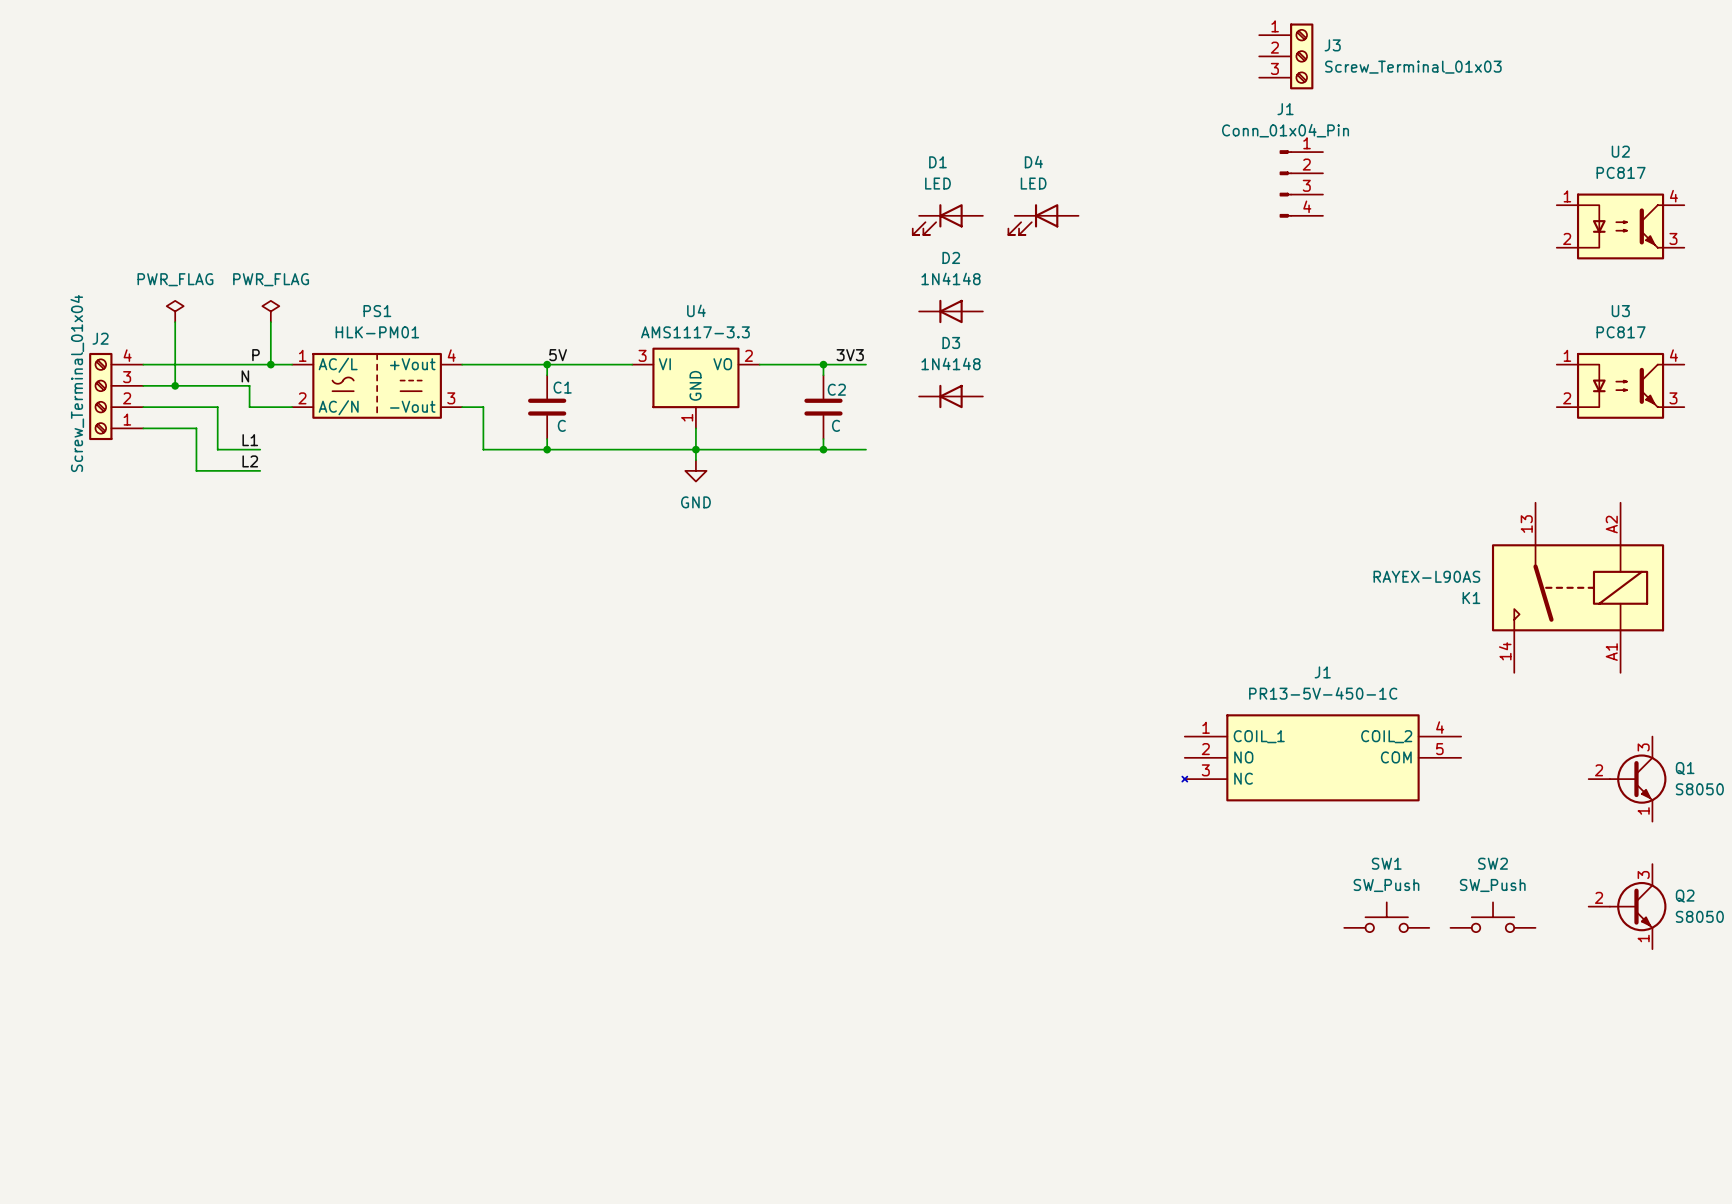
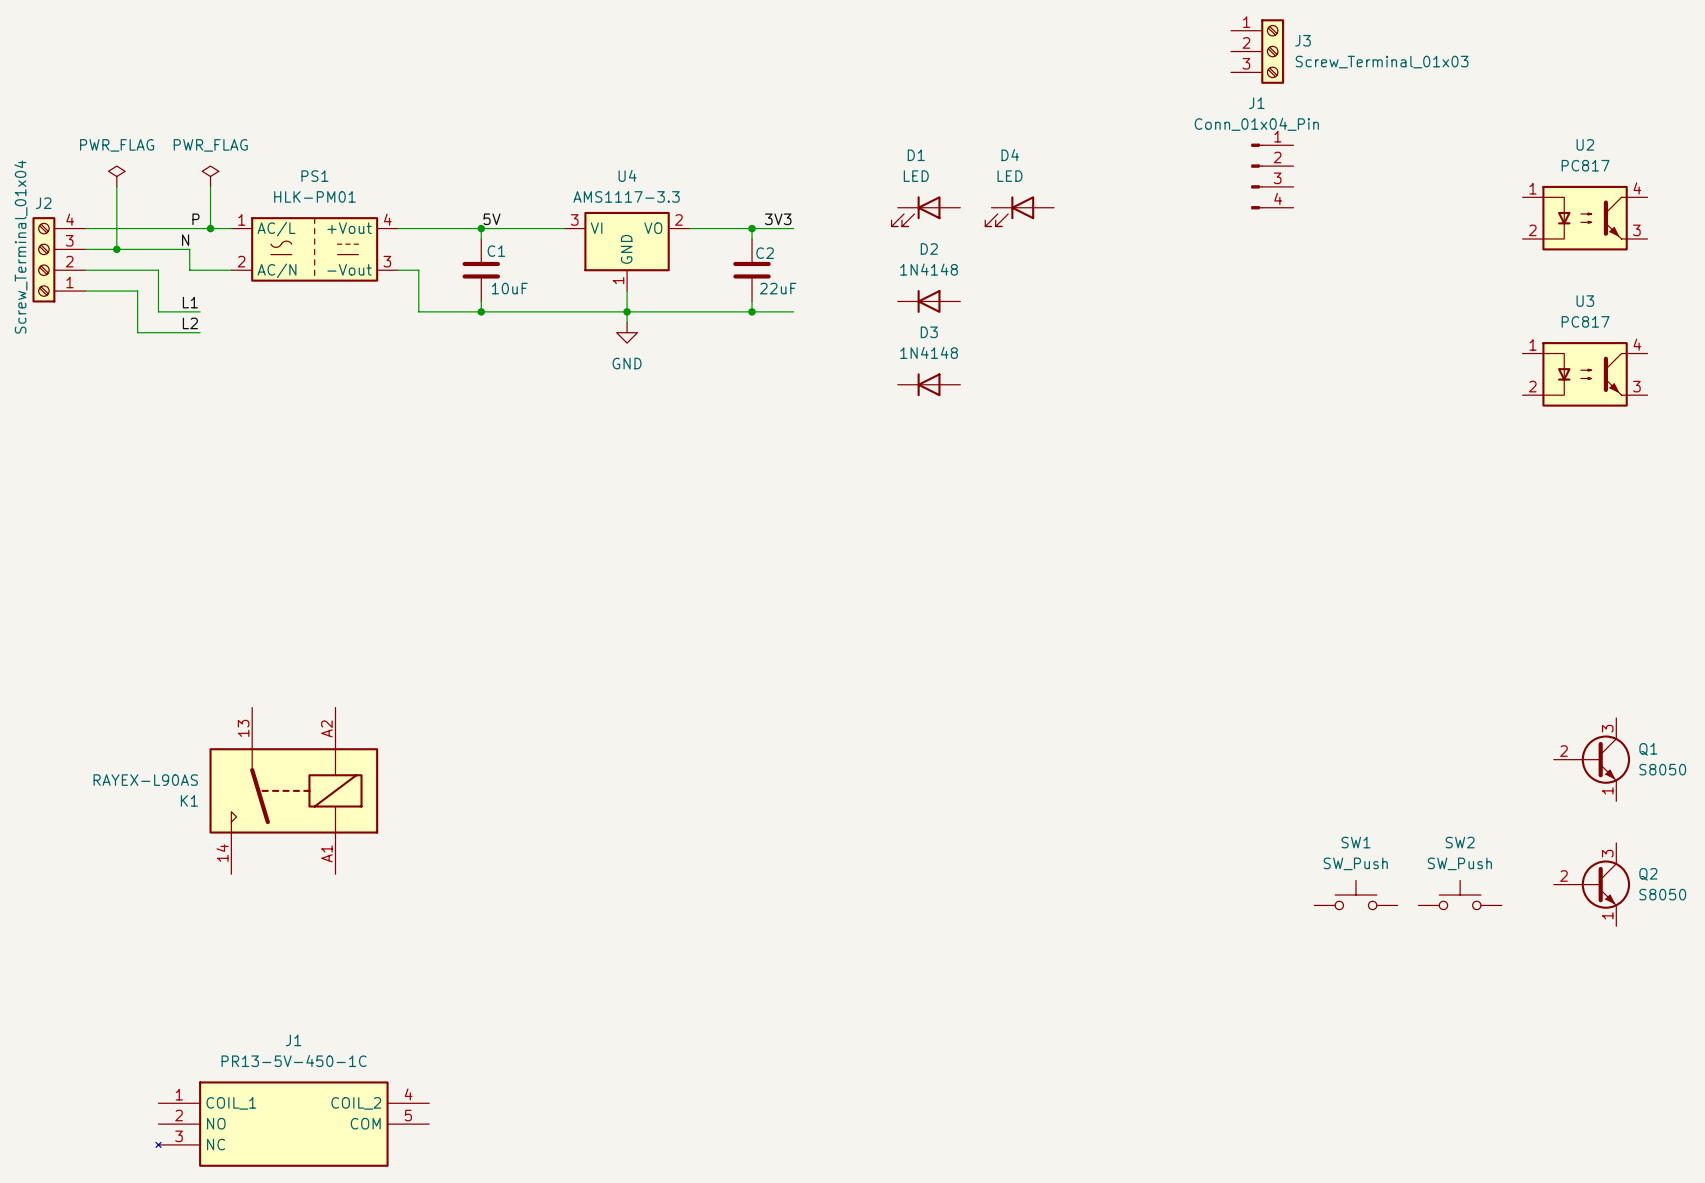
power symbol: none -> PWR_FLAG (116, 176)
power symbol: none -> PWR_FLAG (210, 176)
junction: none -> (210, 228)
junction: none -> (481, 228)
junction: none -> (752, 228)
junction: none -> (116, 249)
power symbol: PWR_FLAG (175, 311) -> none
power symbol: PWR_FLAG (270, 311) -> none
wire: (175, 322) (175, 385) -> (116, 186) (116, 249)
wire: (270, 322) (270, 364) -> (210, 186) (210, 228)
junction: none -> (481, 311)
junction: none -> (627, 311)
junction: none -> (752, 311)
label position: P (255, 355) -> P (195, 219)
label position: 5V (558, 355) -> 5V (492, 219)
label position: 3V3 (850, 355) -> 3V3 (778, 219)
wire: (143, 364) (292, 364) -> (85, 228) (231, 228)
junction: (270, 364) -> none
wire: (462, 364) (632, 364) -> (397, 228) (564, 228)
wire: (547, 364) (547, 375) -> (481, 228) (481, 238)
junction: (547, 364) -> none
wire: (759, 364) (865, 364) -> (689, 228) (793, 228)
wire: (823, 364) (823, 375) -> (752, 228) (752, 238)
junction: (823, 364) -> none
label position: N (245, 376) -> N (185, 240)
wire: (143, 385) (249, 385) (249, 407) (292, 407) -> (85, 249) (189, 249) (189, 270) (231, 270)
junction: (175, 385) -> none
PS1 position: (377, 385) -> (314, 249)
U4 position: (695, 388) -> (627, 251)
J2 position: (116, 396) -> (59, 259)
wire: (143, 407) (217, 407) (217, 449) (260, 449) -> (85, 270) (158, 270) (158, 311) (200, 311)
wire: (462, 407) (483, 407) (483, 449) (865, 449) -> (397, 270) (418, 270) (418, 311) (793, 311)
C1 position: (547, 407) -> (481, 270)
C2 position: (823, 407) -> (752, 270)
C1 value: C (561, 425) -> 10uF (509, 288)
C2 value: C (836, 425) -> 22uF (778, 288)
wire: (143, 428) (196, 428) (196, 470) (260, 470) -> (85, 291) (137, 291) (137, 332) (200, 332)
wire: (695, 428) (695, 460) -> (627, 291) (627, 322)
wire: (547, 439) (547, 449) -> (481, 301) (481, 311)
wire: (823, 439) (823, 449) -> (752, 301) (752, 311)
label position: L1 (250, 440) -> L1 (190, 302)
junction: (547, 449) -> none
junction: (695, 449) -> none
junction: (823, 449) -> none
label position: L2 (250, 461) -> L2 (190, 323)
power symbol position: GND (695, 470) -> GND (627, 332)
K1 position: (1578, 587) -> (293, 790)
J1: PR13-5V-450-1C (1321, 757) -> none
J1: none -> PR13-5V-450-1C (292, 1124)

